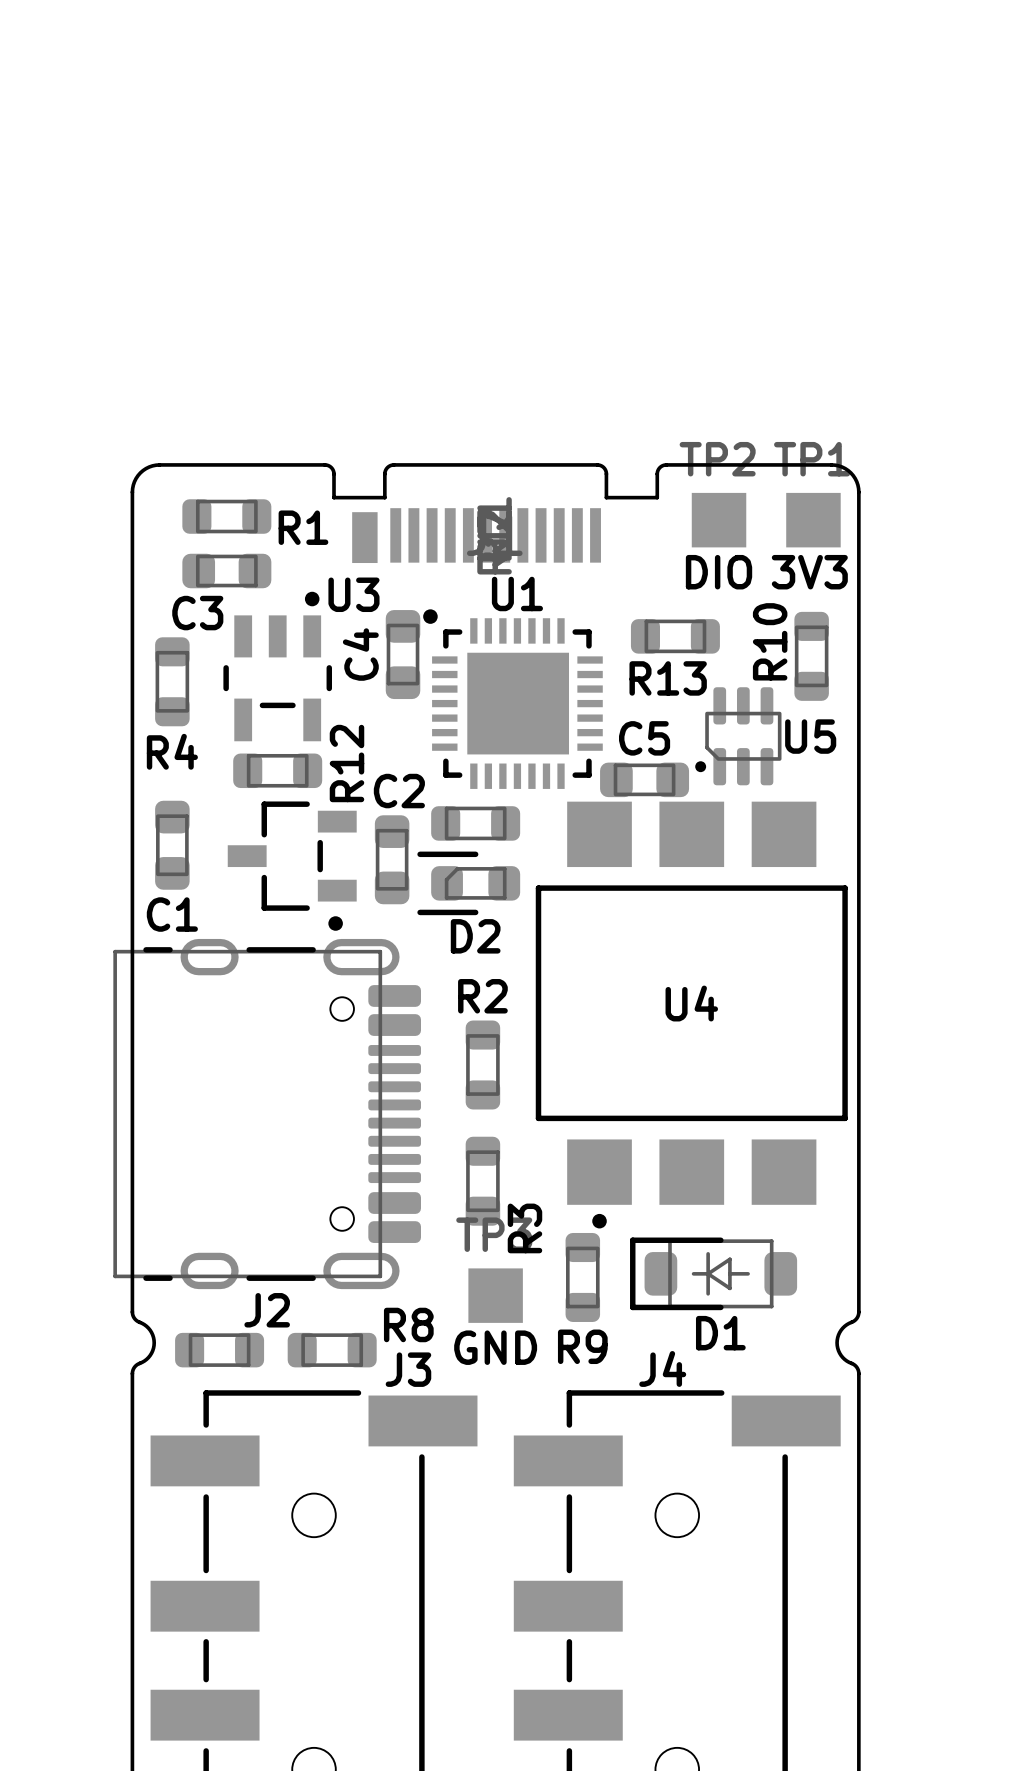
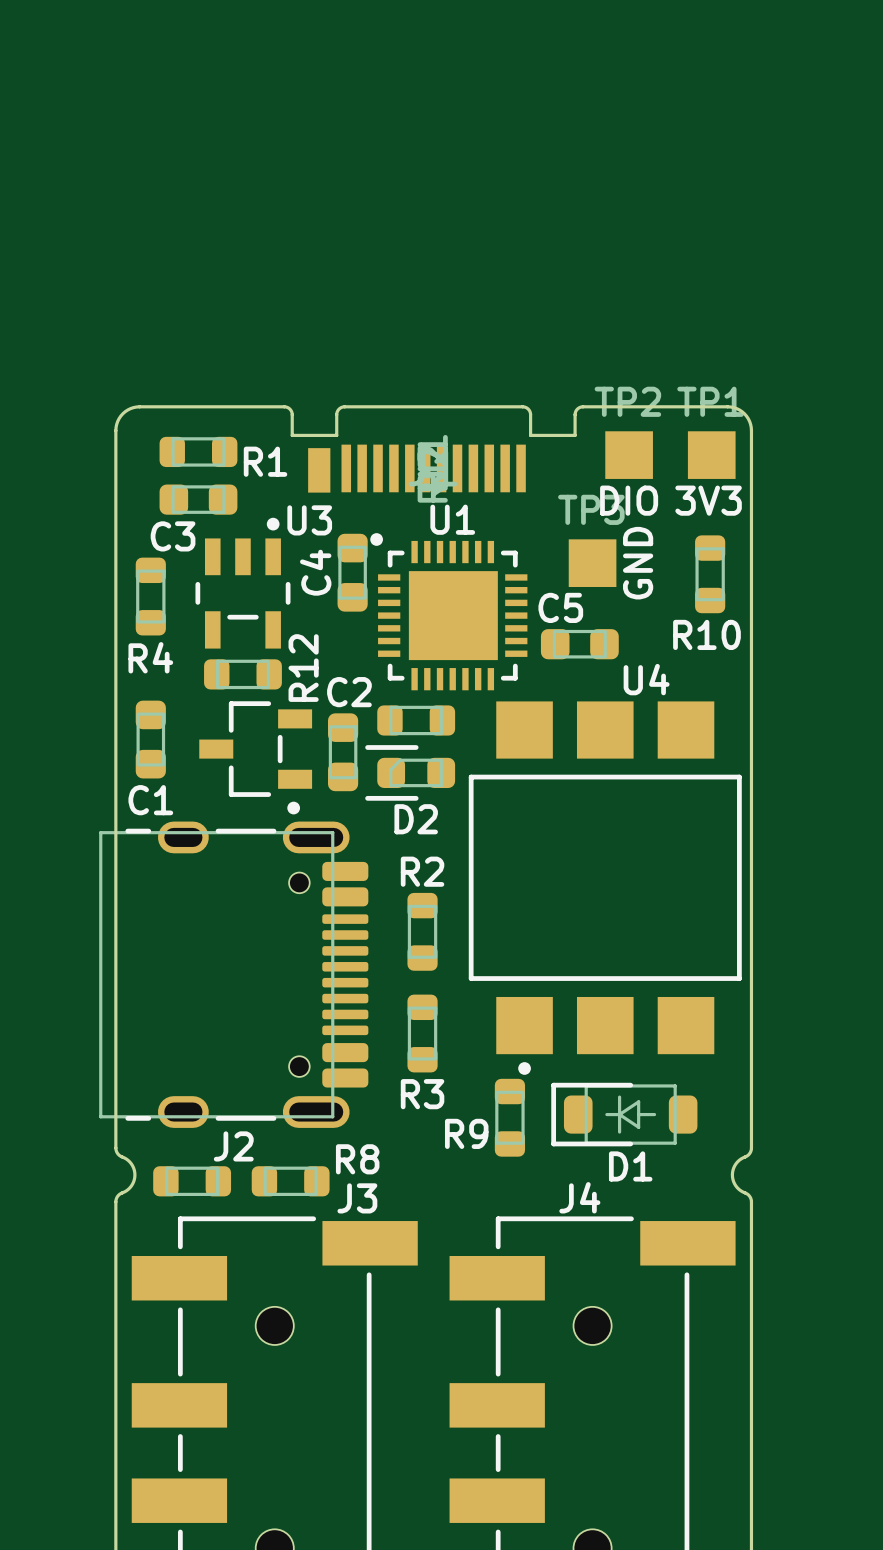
R13: (675, 636) -> none
R10 name rotation: 0° (770, 641) -> 90° clockwise (706, 634)
U5: (738, 736) -> none
C5 name position: C5 (644, 738) -> C5 (560, 607)
C5 position: (644, 779) -> (579, 644)
U4 name position: U4 (691, 1003) -> U4 (646, 679)
R3 name rotation: 0° (524, 1228) -> 90° clockwise (422, 1094)
TP3 position: (495, 1295) -> (592, 563)
R9 name position: R9 (582, 1346) -> R9 (466, 1133)
text rotation: 0° (495, 1347) -> 90° counterclockwise (638, 563)
text position: GND (495, 1347) -> GND (638, 563)

